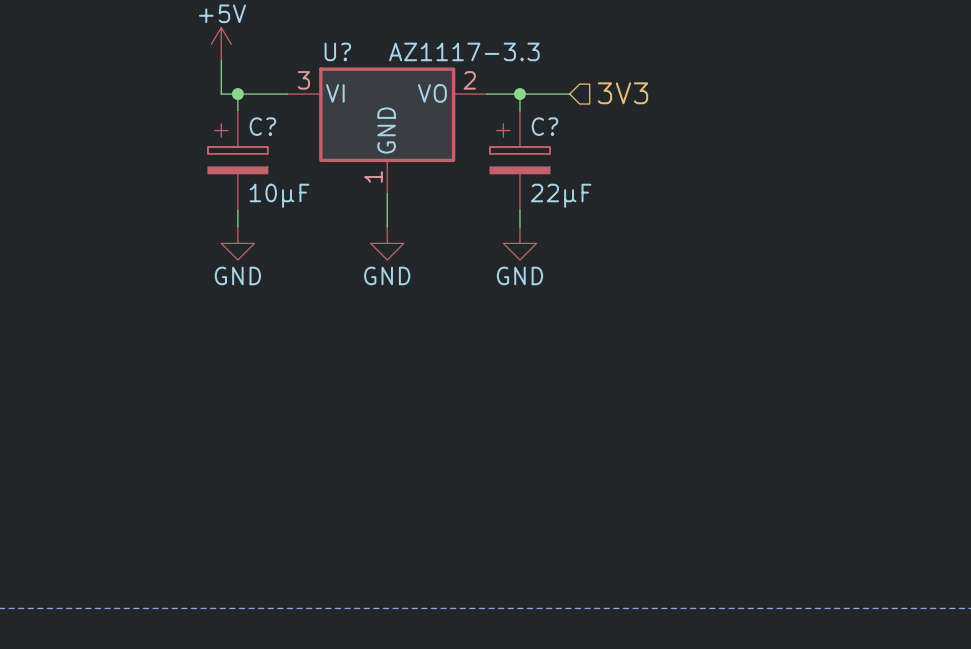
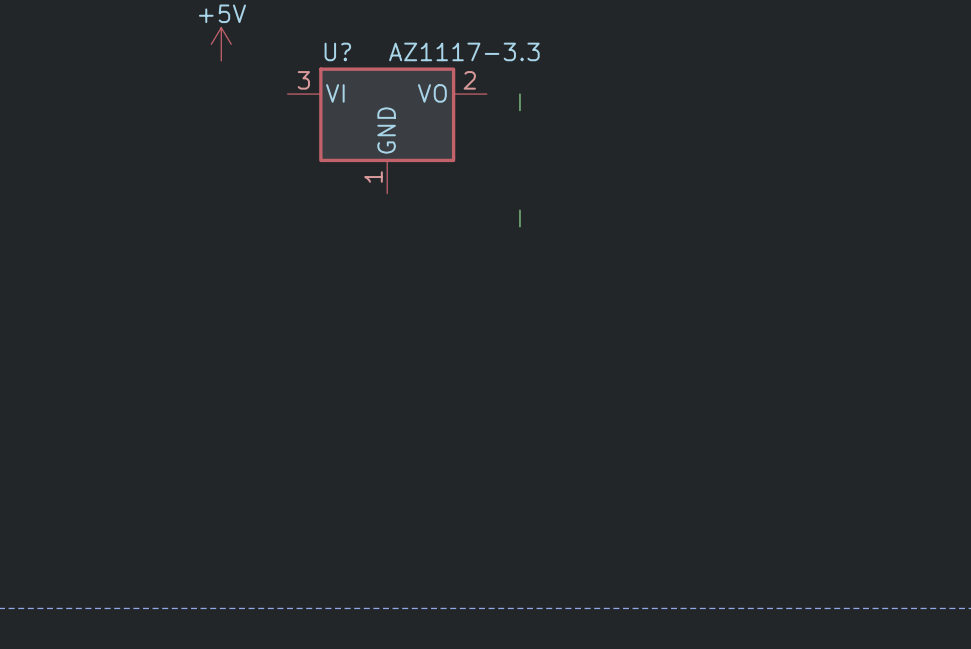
wire: (221, 60) (221, 94) (287, 94) -> none
hierarchical label: 3V3 (622, 93) -> none
wire: (237, 94) (237, 110) -> none
junction: (237, 94) -> none
wire: (486, 94) (569, 94) -> none
junction: (519, 94) -> none
C?: 10μF (237, 160) -> none
C?: 22μF (519, 160) -> none
wire: (387, 193) (387, 226) -> none
wire: (237, 210) (237, 226) -> none
power symbol: GND (237, 243) -> none
power symbol: GND (387, 243) -> none
power symbol: GND (519, 243) -> none

